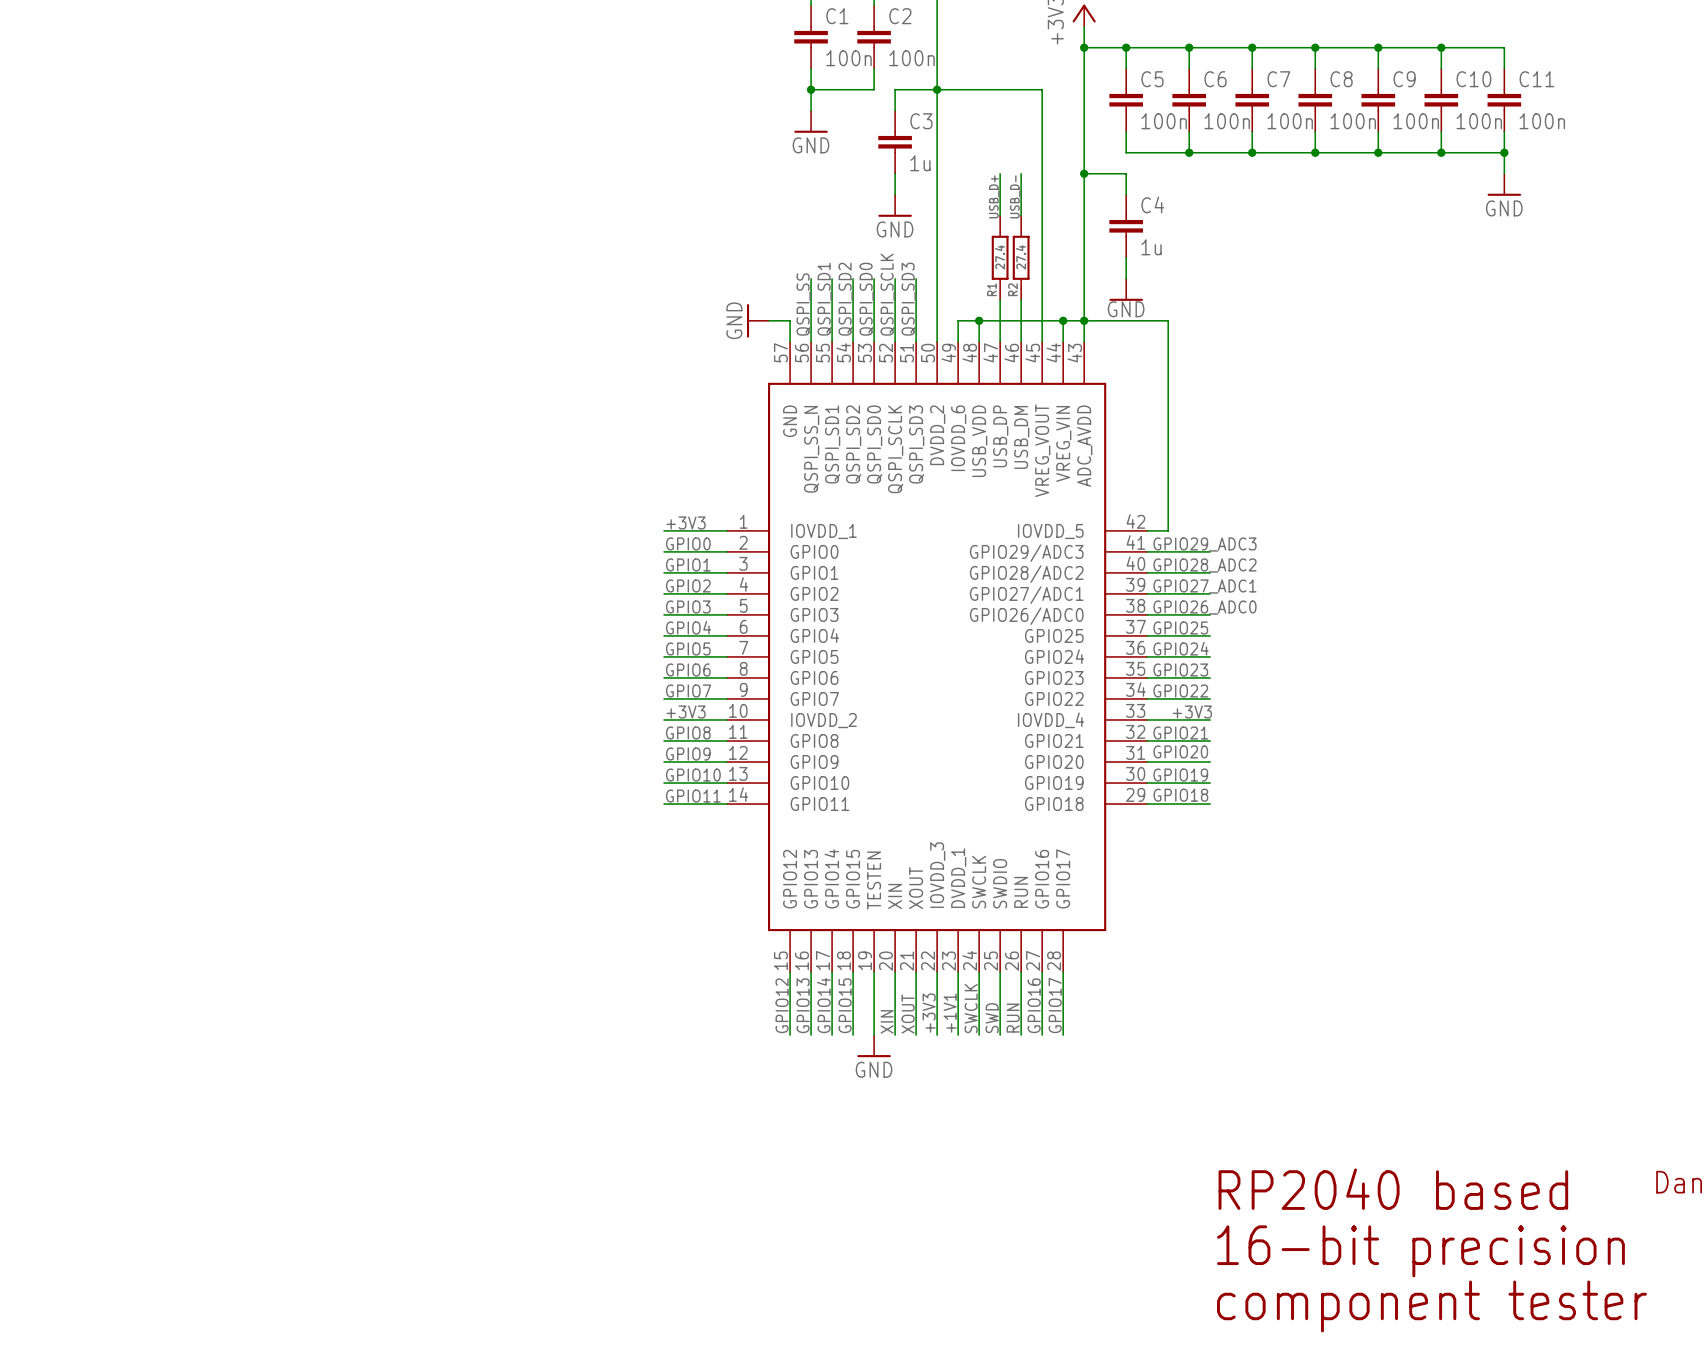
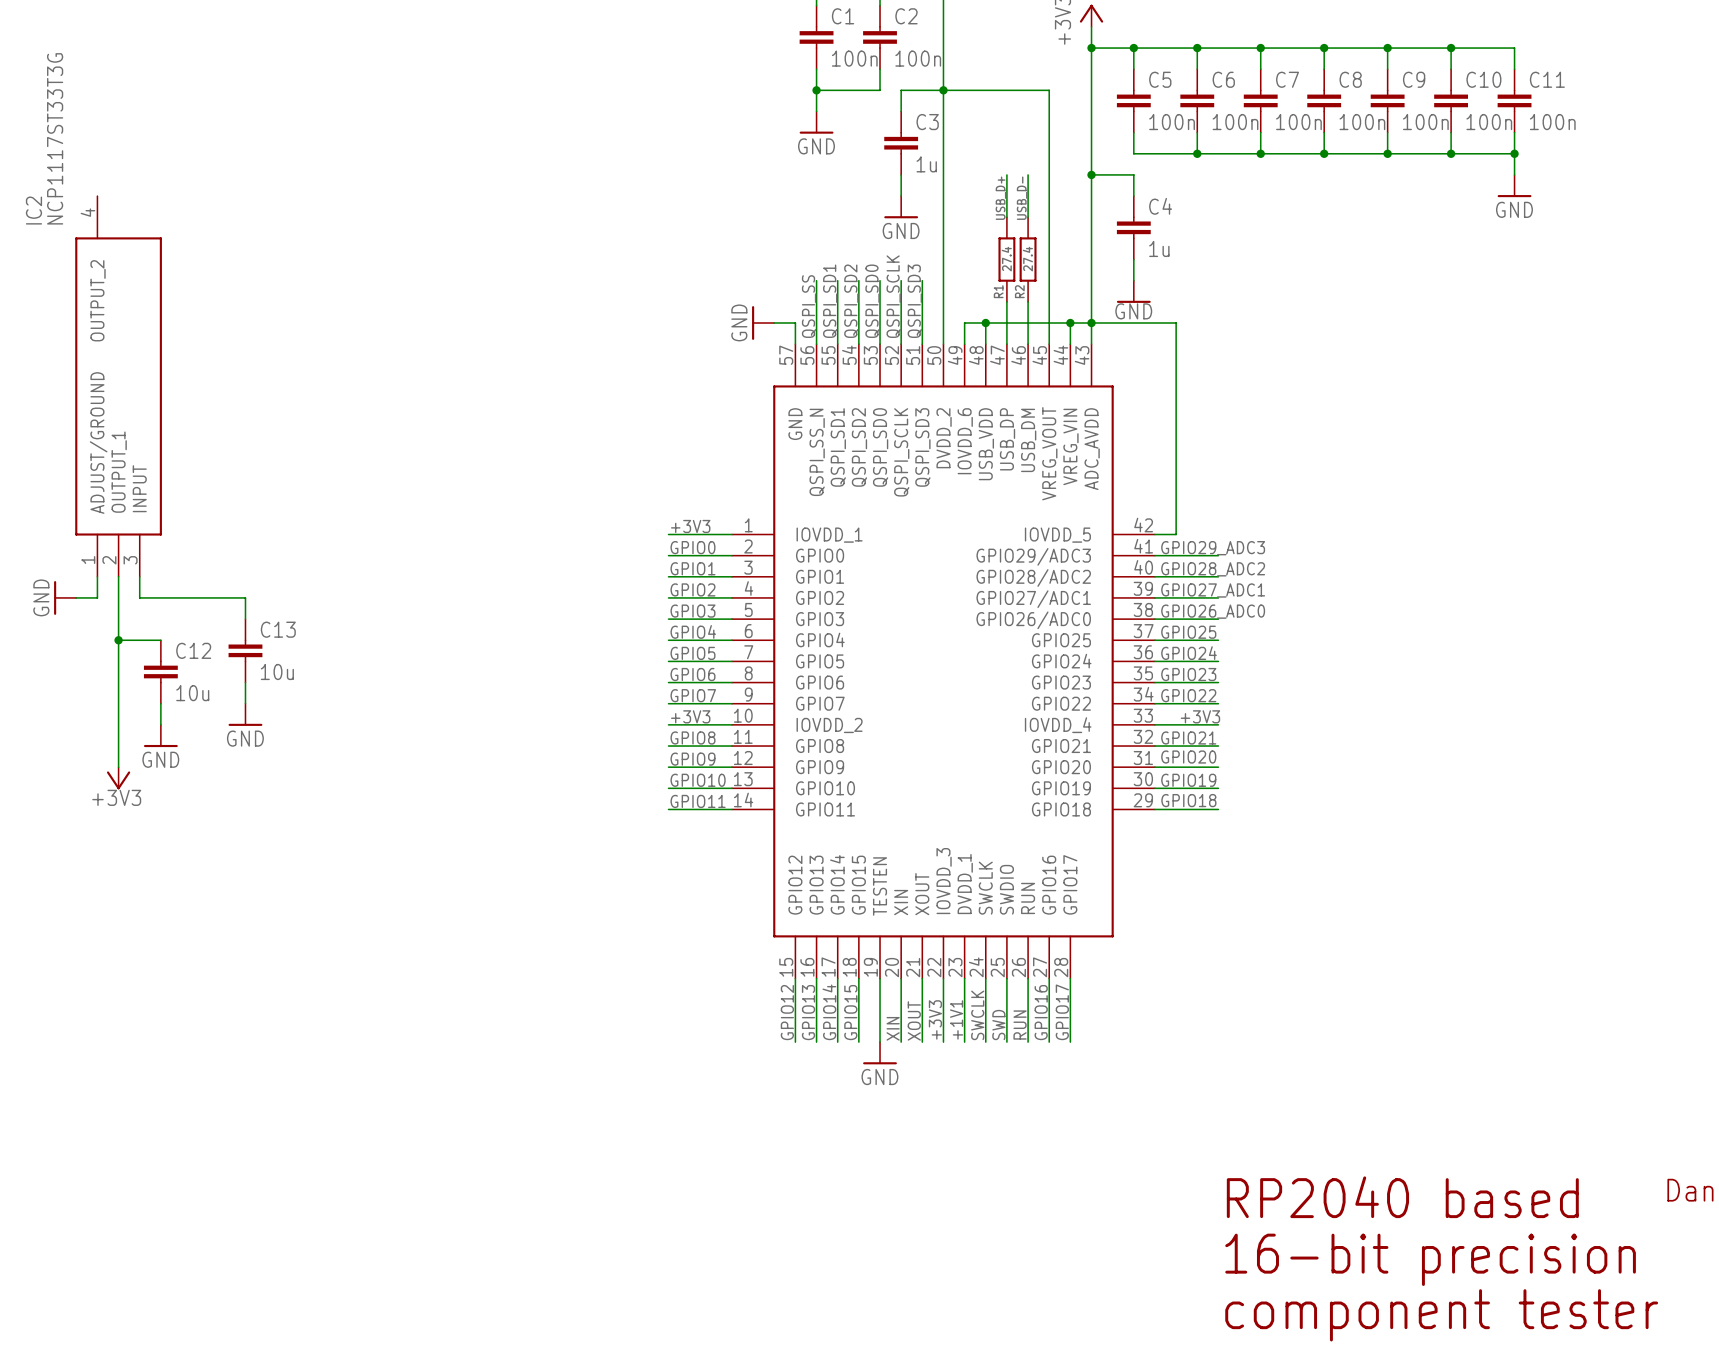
IC2: none -> NCP1117ST33T3G (118, 386)
wire: none -> (97, 576) (97, 597) (76, 597)
wire: none -> (118, 576) (118, 767)
wire: none -> (139, 576) (139, 597) (245, 597) (245, 619)
power symbol: none -> GND (65, 597)
wire: none -> (118, 640) (160, 640)
junction: none -> (118, 640)
C13: none -> 10u (245, 650)
C12: none -> 10u (160, 671)
wire: none -> (245, 682) (245, 703)
wire: none -> (160, 703) (160, 724)
power symbol: none -> GND (245, 714)
power symbol: none -> GND (160, 735)
power symbol: none -> +3V3 (118, 778)

